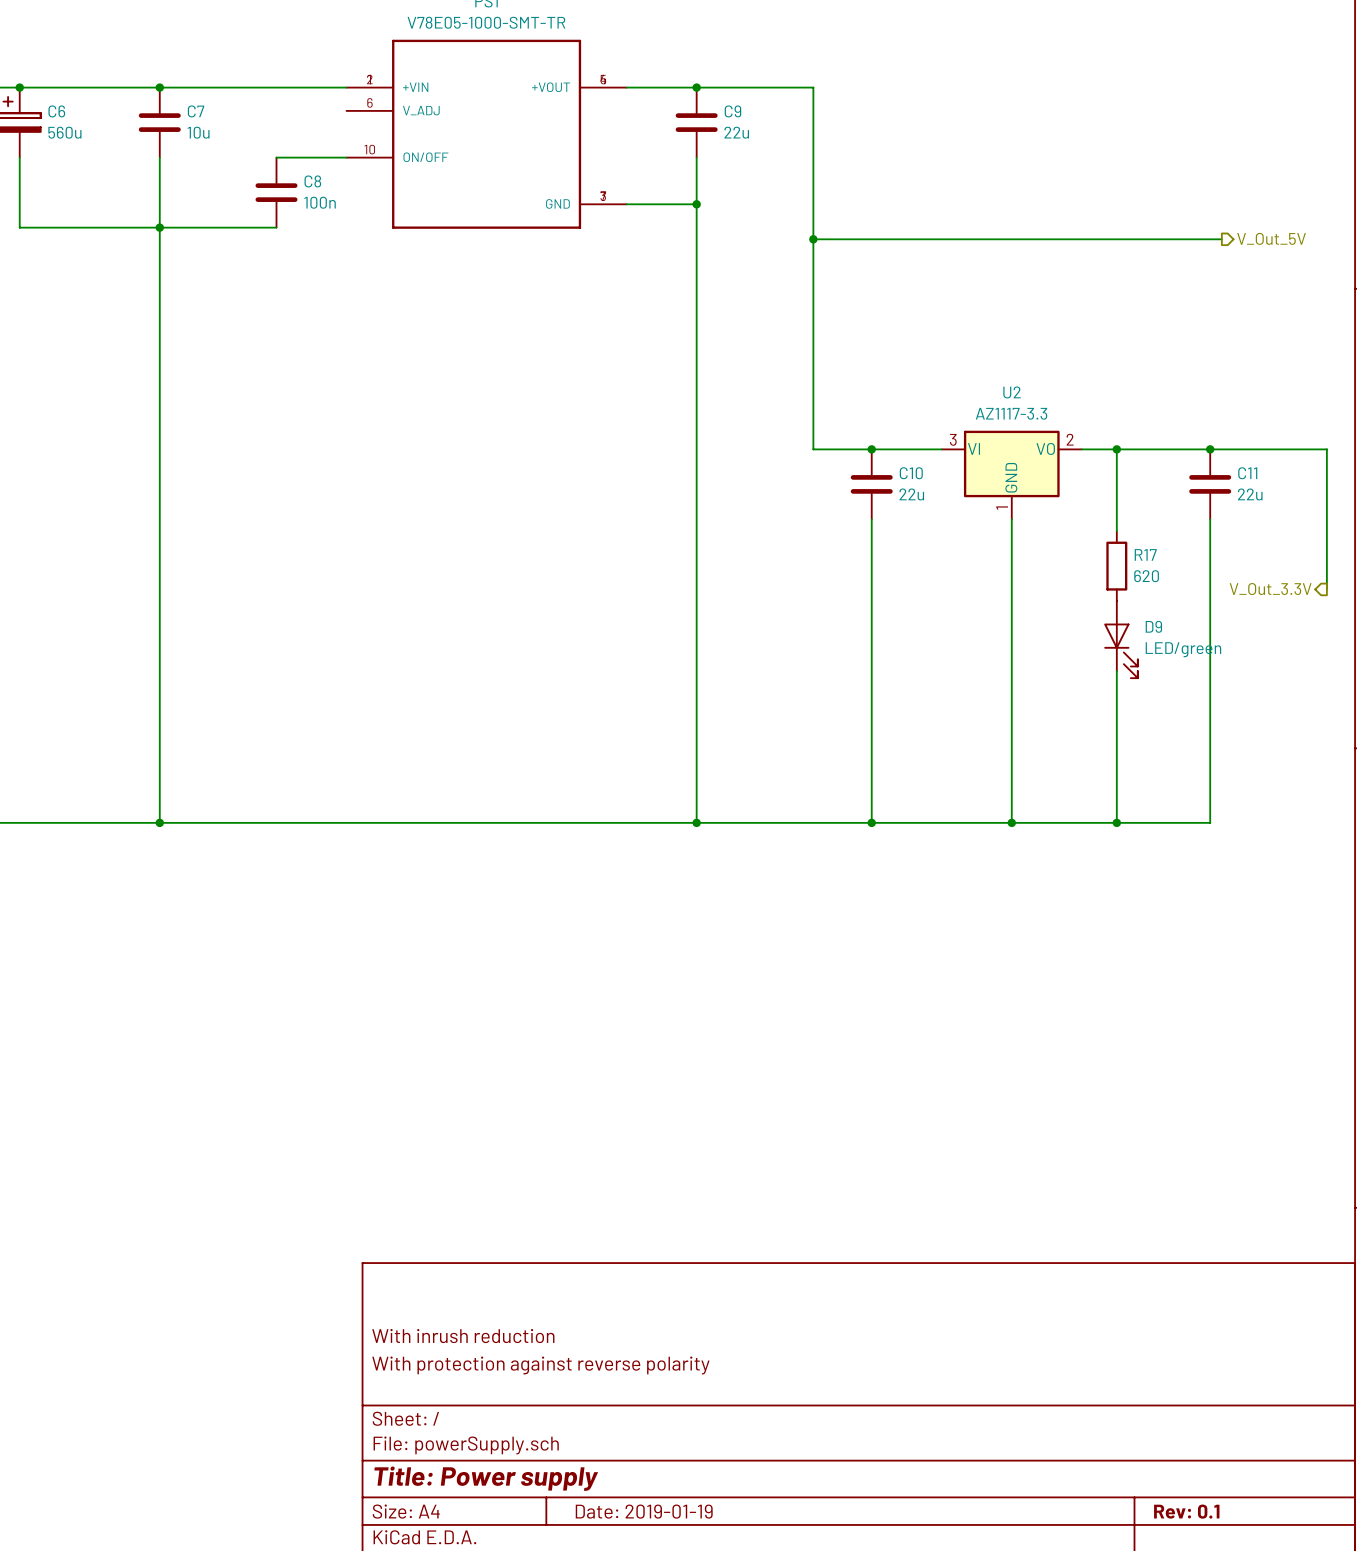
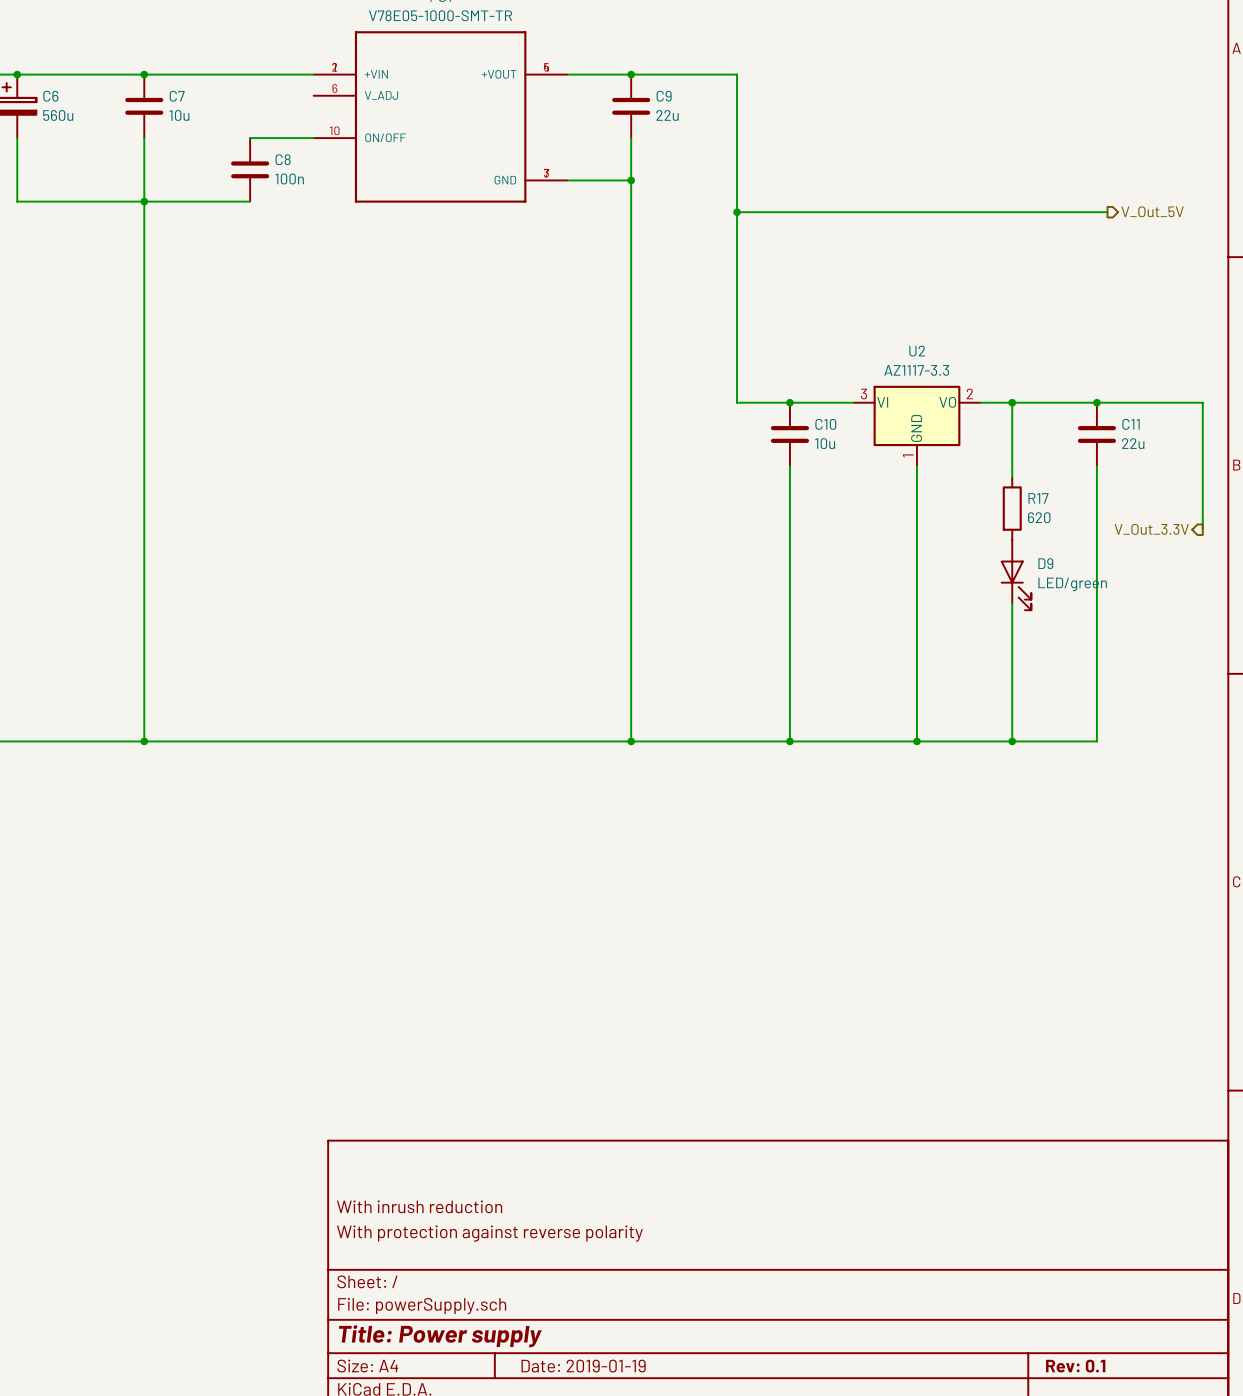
C10 value: 22u (911, 494) -> 10u (825, 443)

